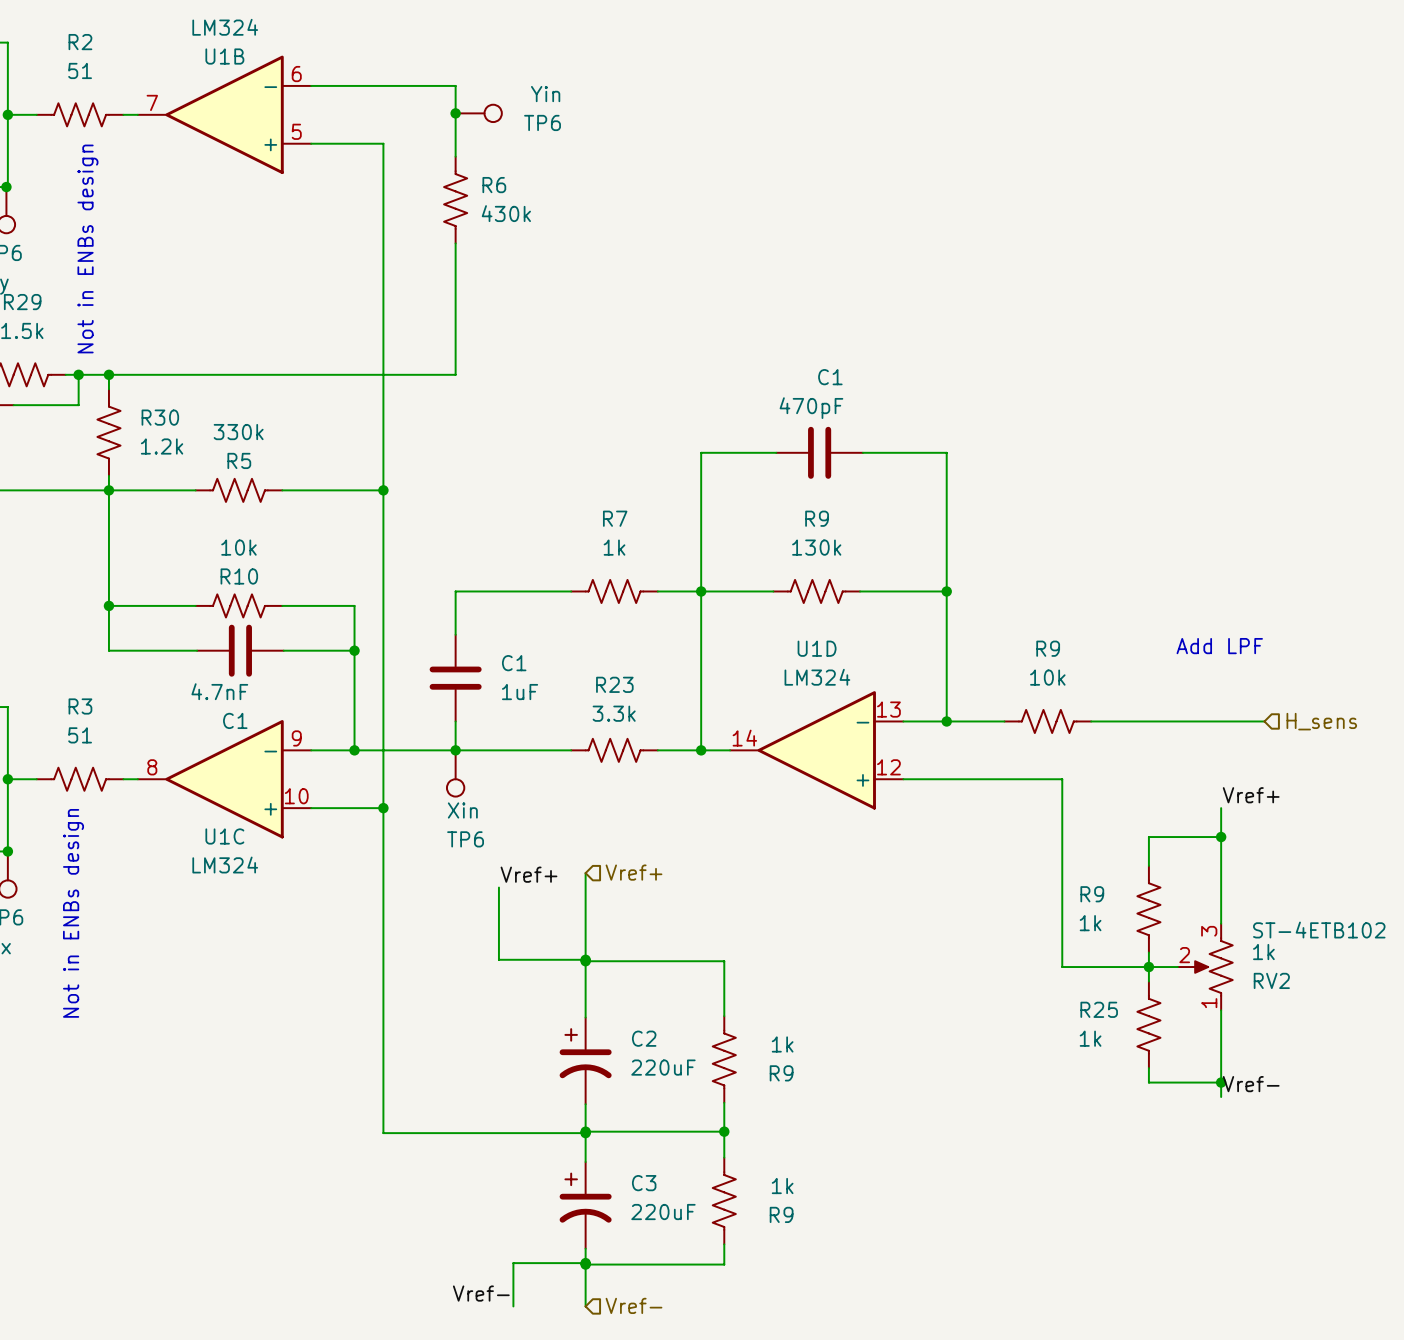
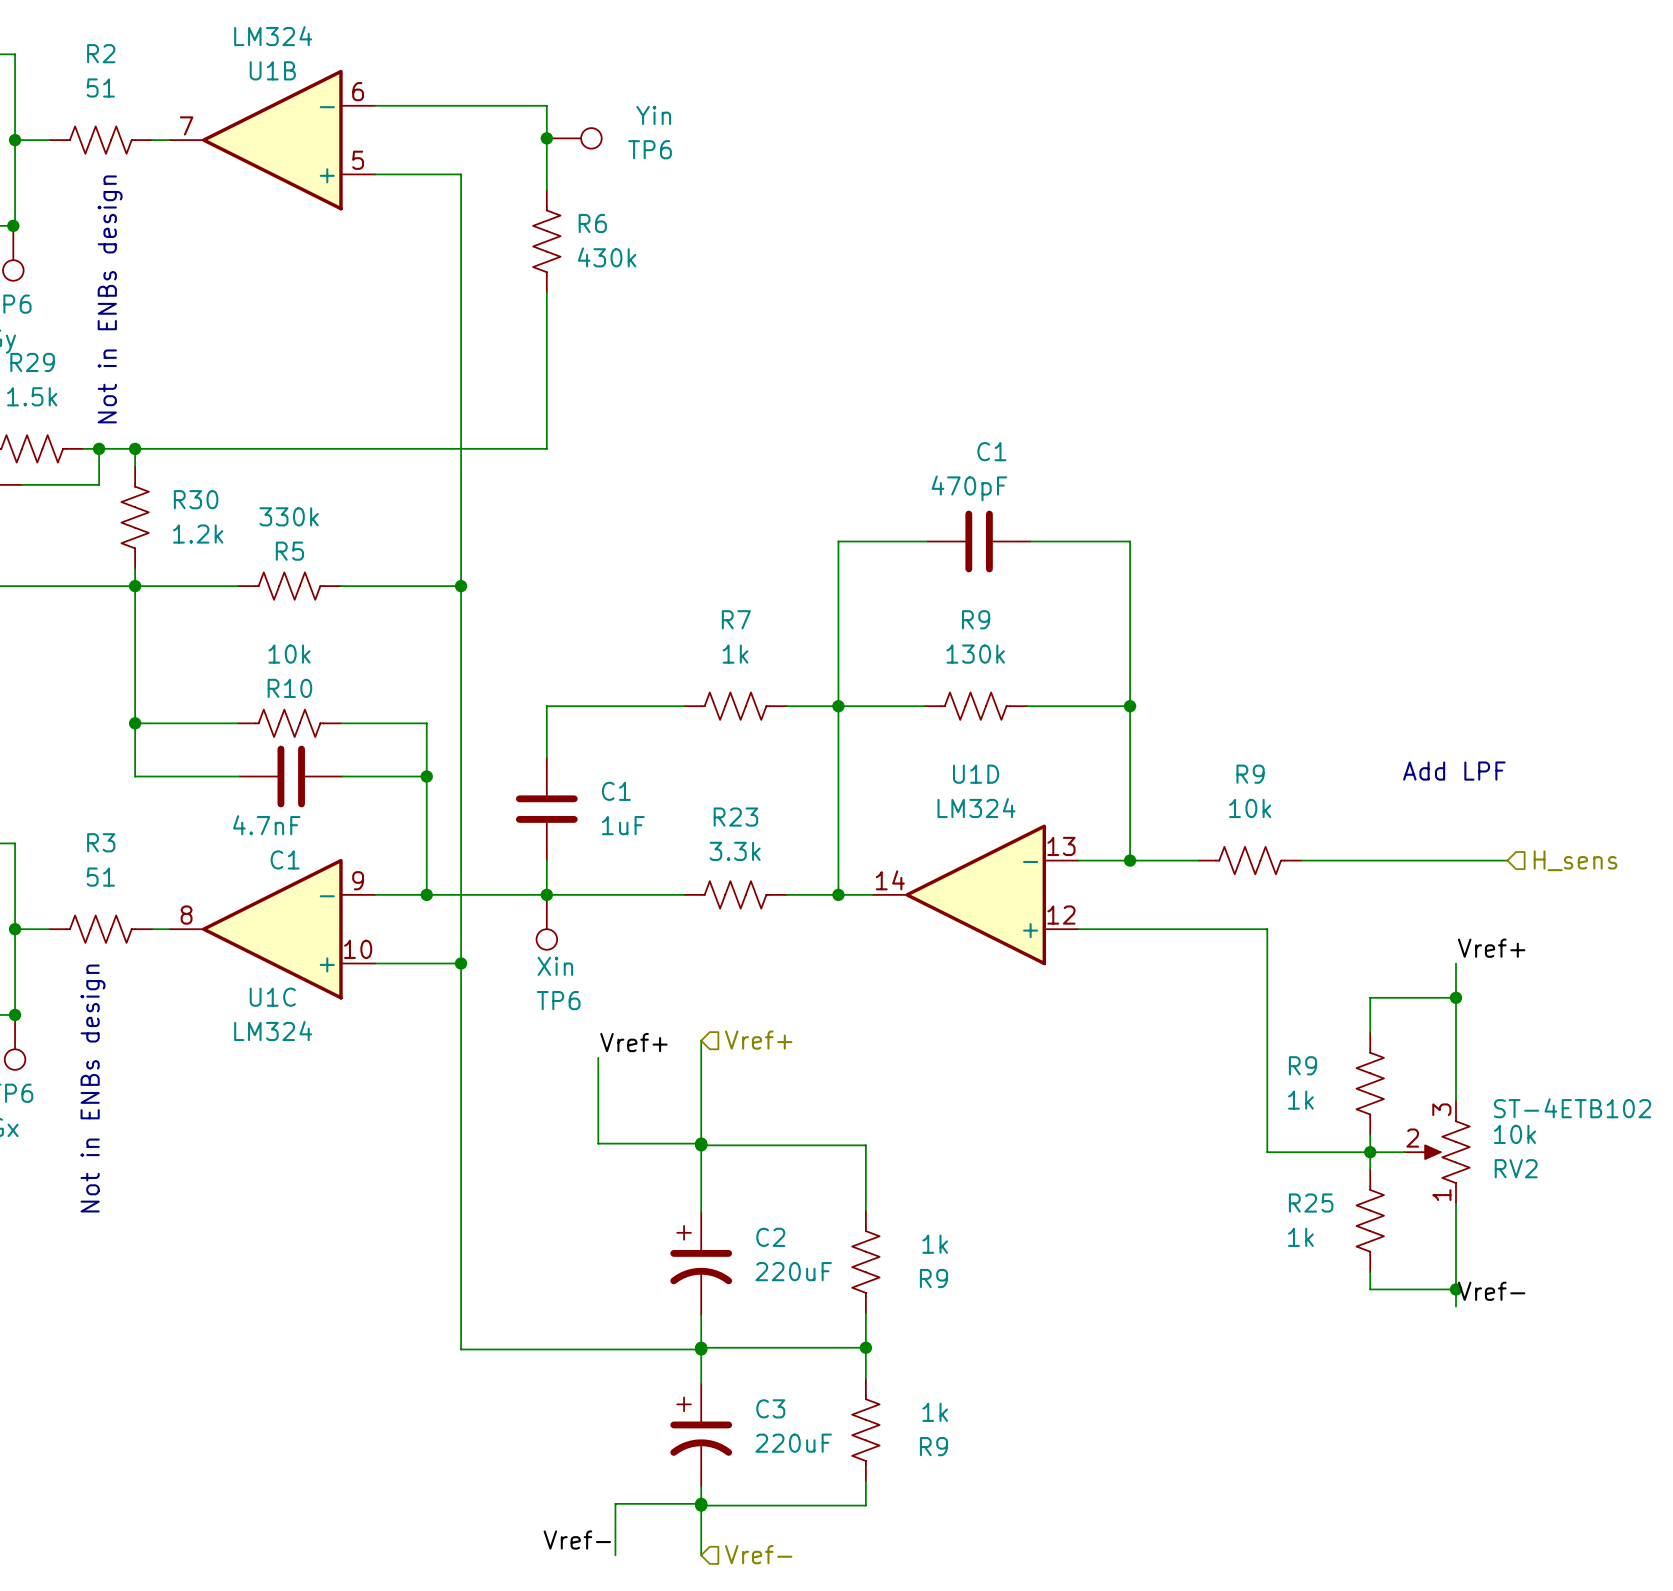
RV2 value: 1k (1263, 952) -> 10k (1514, 1134)

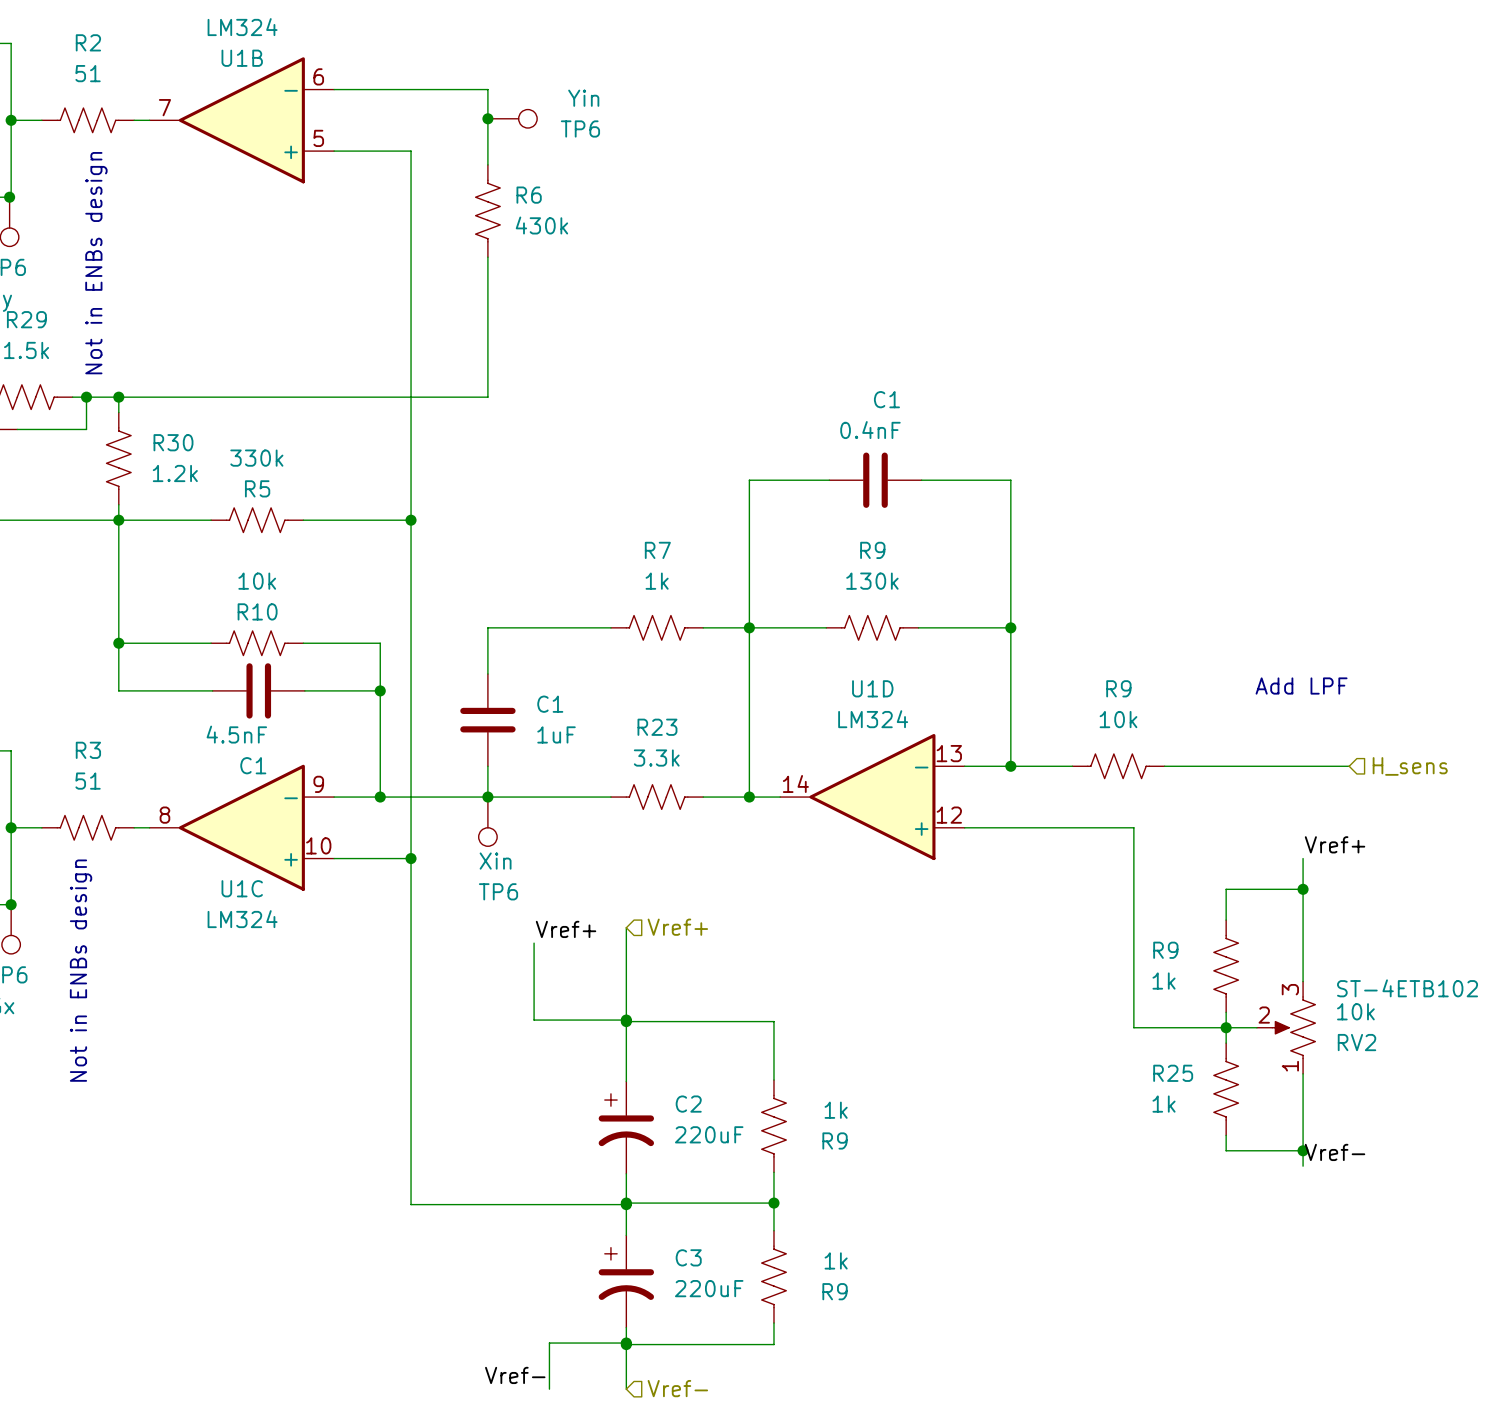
C1 value: 470pF (969, 488) -> 0.4nF (870, 430)
C1 value: 4.7nF (266, 825) -> 4.5nF (236, 734)

